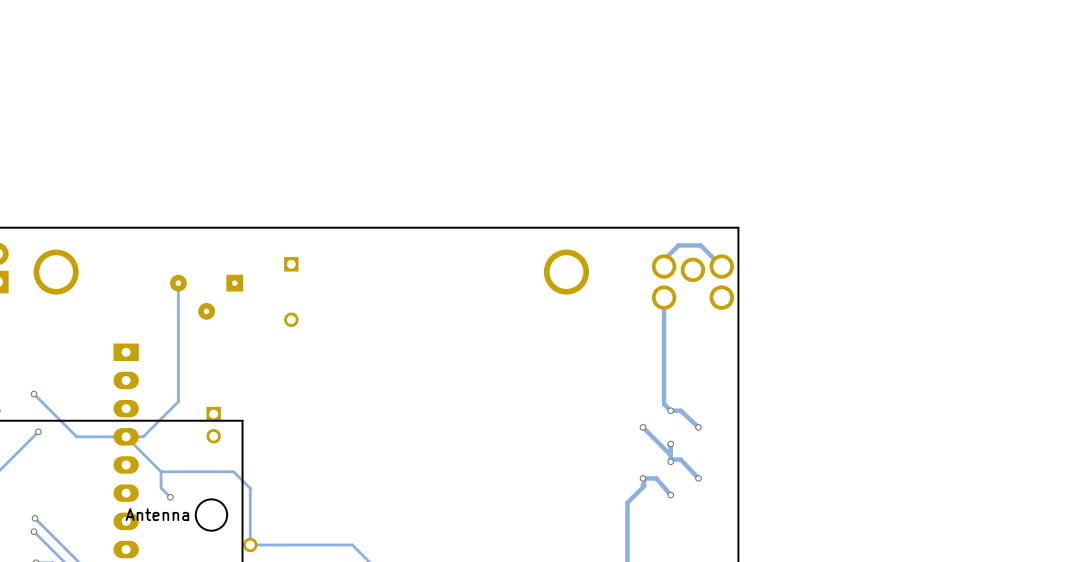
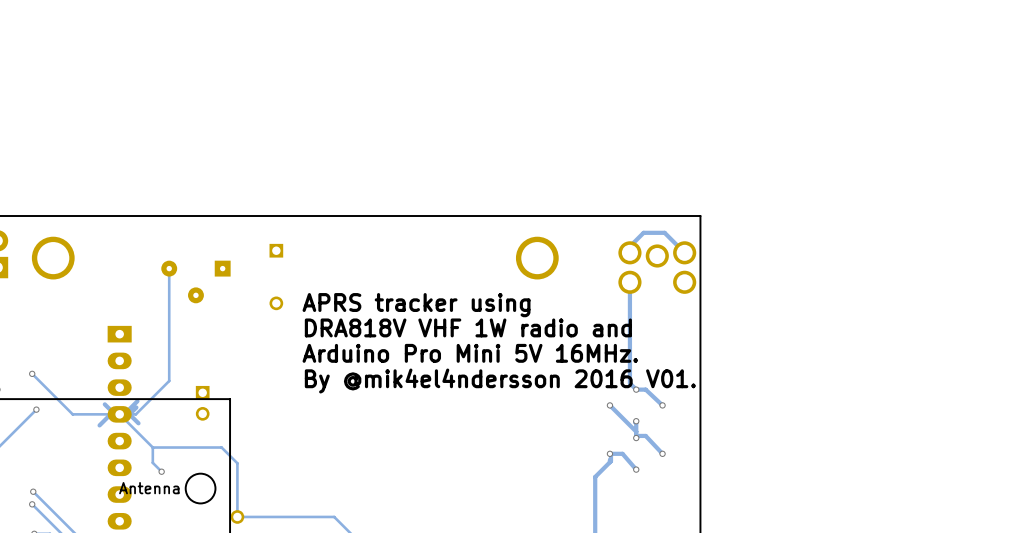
text: none -> APRS tracker using (416, 305)
text: none -> DRA818V VHF 1W radio and (468, 327)
text: none -> Arduino Pro Mini 5V 16MHz. (470, 353)
text: none -> By @mik4el4ndersson 2016 V01. (500, 381)
track: none -> (137, 401) (124, 414)
track: none -> (104, 404) (114, 414)
track: none -> (136, 407) (129, 414) (138, 423)
track: none -> (110, 414) (99, 425)

